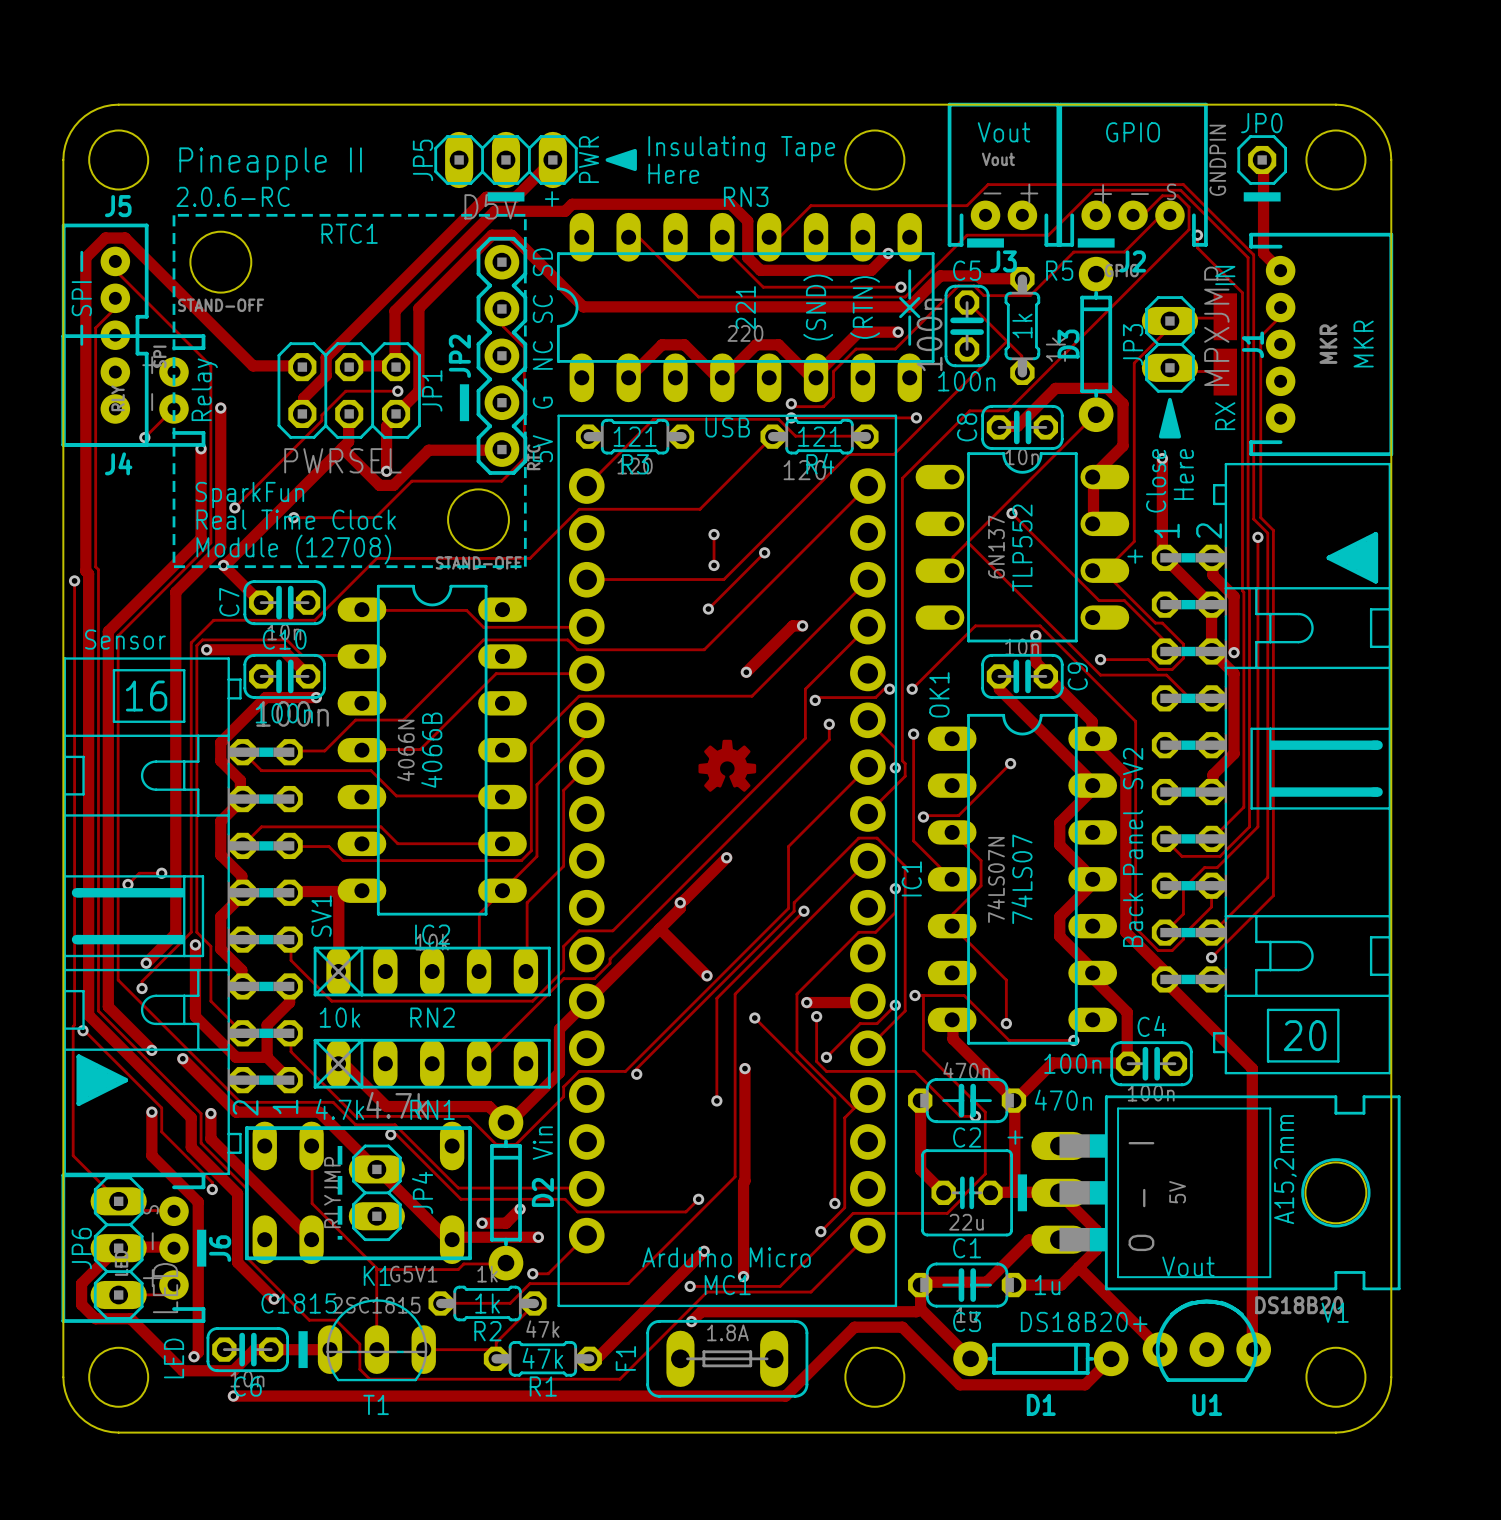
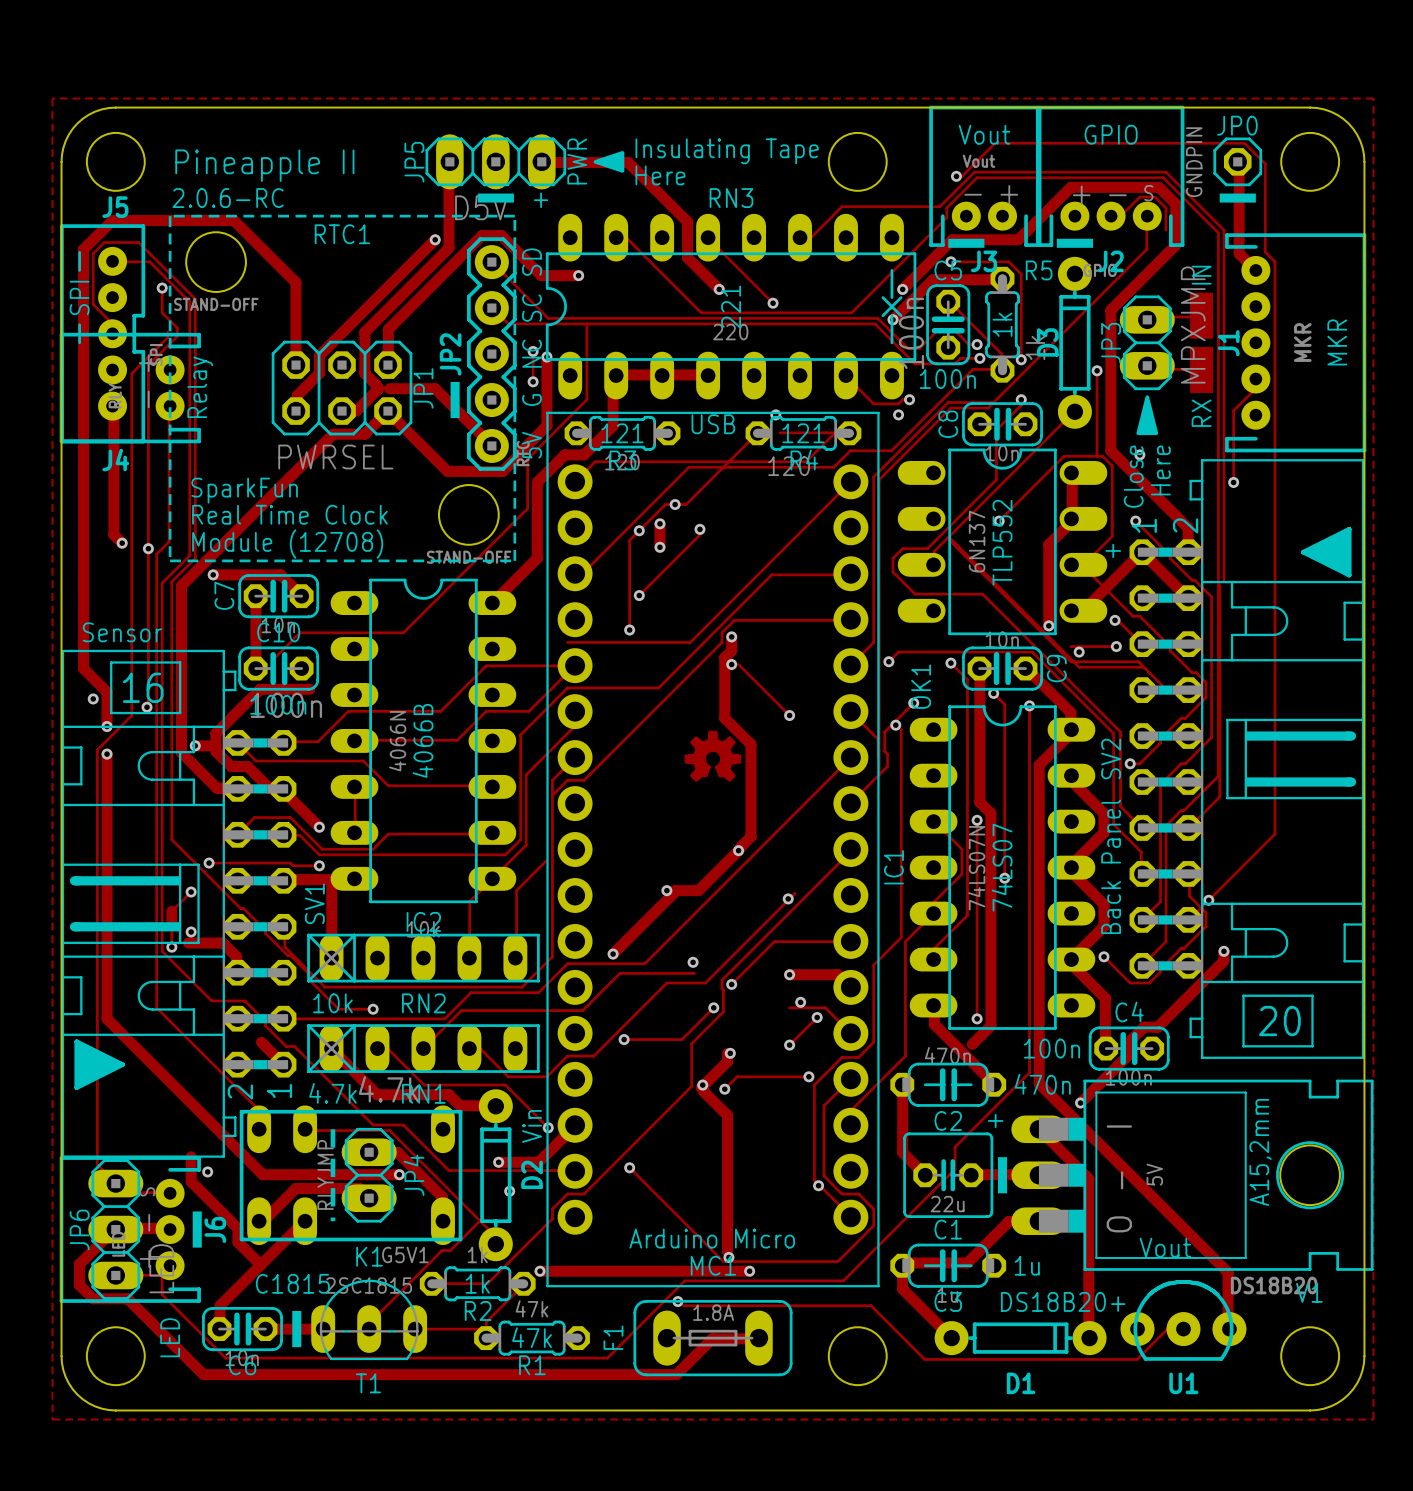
zone outline: none -> (52, 98) (1373, 98) (1373, 1419) (52, 1419) (52, 98)
track: (552, 159) (515, 197) (486, 197) (444, 239) -> (541, 161) (628, 162) (687, 221) (687, 257) (719, 289)
via: none -> (956, 176)
track: (988, 184) (1183, 184) (1253, 254) (1253, 519) (1267, 533) (1267, 877) -> (956, 176) (961, 176) (995, 143) (1244, 143) (1265, 163) (1265, 252) (1274, 261) (1274, 834) (1243, 865)
track: (858, 205) (811, 205) (780, 236) (769, 237) -> (842, 206) (811, 237) (800, 237)
track: (958, 205) (967, 205) -> (684, 296) (701, 312) (851, 312) (946, 217) (948, 206)
track: (1169, 215) (1160, 215) (1124, 252) (1073, 252) (1030, 295) (983, 295) (974, 285) (958, 285) (895, 349) (855, 349) (833, 371) (833, 396) (823, 406) (794, 406) (791, 403) -> none
track: (1189, 229) (1169, 249) -> (1146, 216) (1146, 249)
track: (1197, 235) (1197, 247) (1242, 292) -> (968, 186) (977, 177) (1163, 177) (1218, 232) (1218, 292)
via: (1197, 235) -> none
track: (722, 238) (722, 246) (763, 287) (900, 287) -> (708, 238) (773, 303)
via: none -> (435, 239)
track: (458, 247) (494, 211) (565, 211) (572, 204) (730, 204) (747, 221) (747, 257) (760, 270) (871, 270) (888, 253) -> (449, 248) (449, 161)
via: (888, 253) -> none
track: (85, 257) (105, 238) (125, 238) (253, 365) (302, 365) -> (83, 257) (83, 249) (112, 220) (233, 220) (295, 282) (295, 363)
track: (1248, 257) (1180, 190) (1093, 190) (1048, 235) (967, 235) (905, 297) (698, 297) -> (1223, 257) (1223, 230) (1166, 172) (974, 172) (939, 206)
track: (116, 261) (116, 271) (210, 365) (210, 542) (118, 635) (118, 980) (160, 1022) -> (113, 261) (149, 261) (189, 301) (189, 555) (162, 583) (162, 951) (211, 1000) (244, 1000) (286, 1046) (294, 1046)
track: none -> (950, 261) (1008, 261) (1021, 274) (1021, 359)
via: none -> (950, 261)
track: none -> (491, 262) (548, 318) (877, 318) (908, 348) (919, 348) (937, 330) (955, 330) (968, 344) (977, 344)
track: (552, 275) (583, 306) (909, 306) (940, 275) (1022, 279) -> (893, 319) (933, 279) (1002, 278)
track: none -> (541, 275) (578, 275)
via: none -> (578, 275)
via: (900, 287) -> none
track: none -> (162, 288) (162, 312) (177, 328) (177, 336) (148, 365) (147, 707)
via: none -> (162, 288)
via: none -> (719, 289)
via: none -> (902, 289)
track: (115, 298) (115, 308) (95, 327) (95, 566) (98, 569) (98, 1010) (201, 1113) (201, 1143) (247, 1189) (247, 1258) (309, 1320) (335, 1320) (359, 1344) (359, 1369) (369, 1379) -> (170, 1265) (162, 1275) (162, 1294) (225, 1358) (362, 1358)
via: none -> (773, 303)
text: (SND) (818, 307) -> none
text: (RTN) (865, 307) -> none
track: (1280, 307) (1280, 316) (1260, 336) (1260, 517) (1273, 530) (1273, 895) (1229, 939) -> (1188, 873) (1189, 896) (1206, 912) (1206, 926)
track: (418, 308) (418, 391) (386, 426) (386, 471) -> (410, 307) (388, 329) (387, 365)
track: (503, 309) (503, 326) (524, 347) (524, 458) (501, 481) (411, 481) (375, 517) (293, 517) -> (493, 308) (508, 323) (875, 323) (915, 363) (955, 363) (960, 358) (979, 358)
track: (395, 311) (396, 367) (349, 367) -> (386, 310) (364, 332) (364, 373) (378, 388) (356, 410) (342, 411)
track: (1169, 321) (1169, 327) (1134, 363) (1134, 469) -> (999, 521) (1064, 456) (1102, 456) (1112, 465)
track: none -> (586, 323) (586, 399) (527, 459) (527, 508) (403, 632) (300, 632) (275, 657)
track: (898, 332) (858, 332) (818, 372) (816, 377) (811, 377) (778, 344) (756, 344) (722, 377) -> none
via position: (898, 332) -> (893, 319)
track: (1007, 341) (893, 454) -> (1002, 370) (973, 369) (891, 450) (876, 450)
via: none -> (977, 344)
via: none -> (533, 351)
track: none -> (546, 356) (546, 425) (502, 471) (447, 471) (387, 411) (364, 434) (333, 434) (181, 585) (181, 752) (217, 788) (237, 788)
via: none -> (546, 356)
via: none -> (979, 358)
via: none -> (1021, 359)
track: none -> (1097, 370) (1097, 456)
via: none -> (1097, 370)
track: none -> (616, 375) (613, 380) (613, 425) (584, 454) (564, 454) (537, 482) (537, 558) (492, 603)
track: (629, 377) (662, 344) (684, 344) (716, 377) -> (617, 374) (702, 374)
track: none -> (845, 375) (873, 403) (898, 403) (902, 399) (909, 399)
track: none -> (1255, 379) (1255, 388) (1233, 410) (1233, 482)
via: none -> (533, 381)
track: (386, 391) (345, 391) (321, 415) (321, 420) (234, 507) -> none
via: (397, 391) -> none
via: none -> (909, 399)
via: none -> (1021, 399)
via: (791, 403) -> none
track: none -> (993, 402) (948, 402) (873, 476) (873, 642) (850, 665)
track: none -> (112, 406) (113, 534) (122, 543)
track: (220, 408) (220, 547) (175, 592) -> (112, 333) (112, 323) (93, 304) (93, 253) (104, 242) (138, 242) (195, 299) (195, 558) (171, 581) (171, 585)
via: (220, 408) -> none
track: (172, 409) (144, 437) -> (169, 406) (169, 541) (156, 554) (156, 1007)
track: (349, 413) (348, 441) (223, 565) (261, 602) -> (255, 668) (255, 596)
track: (791, 417) (916, 417) -> none
track: (998, 427) (1017, 426) (1055, 388) (1107, 388) (1123, 403) (1123, 446) (1092, 477) -> none
track: (795, 436) (778, 419) (653, 419) (607, 465) -> (849, 433) (833, 434) (806, 461) (595, 461)
via: (144, 437) -> none
track: (201, 448) (201, 538) (108, 631) (108, 1006) (151, 1050) -> none
via: (201, 448) -> none
track: (342, 448) (379, 485) (393, 485) (428, 450) (501, 449) -> (389, 388) (435, 388) (491, 445)
track: (867, 454) (848, 454) (723, 579) (594, 579) -> (850, 450) (833, 467) (688, 467) (582, 573)
track: (1162, 458) (1162, 552) (1164, 557) -> (1071, 610) (1083, 610) (1142, 552)
via: (386, 471) -> none
track: (902, 478) (902, 741) -> (884, 474) (879, 479) (879, 774)
via: none -> (1233, 482)
via: (234, 507) -> none
track: (678, 509) (579, 509) (529, 558) (376, 558) (314, 620) (213, 620) (191, 642) (191, 932) (142, 981) (142, 988) -> (665, 504) (629, 540) (629, 630)
via: none -> (675, 504)
track: (1011, 513) (1099, 600) (1124, 600) (1163, 639) (1163, 651) -> (1115, 620) (1117, 620) (1141, 643)
via position: (1011, 513) -> (999, 521)
via: (293, 517) -> none
track: none -> (1071, 518) (1069, 523) (1048, 544) (1048, 625)
via: none -> (1135, 521)
track: none -> (659, 523) (659, 547)
via: none -> (659, 523)
track: (714, 534) (714, 565) -> (533, 351) (533, 381)
via: none -> (639, 530)
track: none -> (702, 532) (639, 595)
track: (1257, 537) (1257, 826) (1217, 867) (1204, 867) (1183, 888) -> (1135, 521) (1192, 580) (1195, 580) (1211, 596) (1211, 737) (1185, 763) (1181, 763) (1160, 784) (1160, 876)
via: (1257, 537) -> none
via: none -> (122, 543)
via: none -> (659, 547)
track: (764, 552) (708, 609) -> none
via: (764, 552) -> none
via: none -> (148, 548)
track: (1211, 557) (1212, 575) (1234, 596) (1234, 652) -> (1188, 552) (1188, 527) (1110, 450) (1110, 310) (1175, 245) (1175, 203) (1159, 187) (1070, 187) (1018, 239) (952, 239) (902, 289)
via position: (223, 565) -> (213, 574)
via: (714, 565) -> none
track: (85, 571) (88, 573) (88, 1015) (191, 1117) (191, 1147) (237, 1193) (237, 1262) (274, 1299) -> (83, 565) (83, 668) (107, 692) (107, 726)
track: (74, 580) (73, 1155) (99, 1182) -> (167, 332) (167, 337) (131, 373) (131, 715) (97, 749) (97, 1165)
via: (74, 580) -> none
track: none -> (213, 574) (280, 574) (301, 596)
track: (867, 580) (751, 696) (671, 696) -> (850, 574) (771, 574) (658, 687)
track: (1248, 587) (1249, 826) (1219, 856) (1182, 856) (1164, 838) -> (1021, 399) (1021, 405) (996, 430) (996, 479) (927, 548) (902, 548) (893, 558) (893, 572) (915, 594) (982, 594) (1120, 732) (1120, 806) (1142, 827)
track: none -> (1218, 584) (1218, 776) (1166, 825) (1166, 941) (1142, 965)
track width: thick (175, 592) (175, 850) -> thin (171, 585) (171, 839)
via: none -> (639, 595)
track: (1211, 604) (1211, 651) (1234, 673) (1234, 753) (1212, 774) (1211, 792) -> none
track: (361, 609) (466, 610) (483, 627) (586, 626) -> none
via: (708, 609) -> none
track: (802, 625) (792, 625) (746, 672) -> none
via: (802, 625) -> none
track: (867, 627) (805, 689) (805, 738) (612, 930) (579, 930) (563, 946) -> (850, 620) (734, 620) (722, 632) (722, 642) (584, 780) (567, 780) (552, 795)
via: none -> (1115, 620)
track: (1035, 635) (1035, 662) (1044, 670) (1045, 676) -> none
via position: (1035, 635) -> (1048, 625)
via: none -> (629, 630)
track: none -> (731, 636) (731, 650) (724, 657) (724, 718) (750, 744) (750, 836) (698, 890) (675, 890) (613, 954)
via: none -> (731, 636)
track: (1183, 644) (1183, 658) (1172, 669) (1160, 669) -> (1143, 667) (1138, 661)
track: none -> (1160, 636) (1170, 646) (1170, 650) (1192, 672) (1196, 672) (1206, 682) (1206, 697) (1185, 718) (1181, 718) (1139, 763) (1130, 763)
track: (206, 649) (282, 649) (308, 676) -> none
via: (206, 649) -> none
track: (579, 649) (567, 639) (483, 639) (403, 720) -> none
via: (1234, 652) -> none
track: none -> (1070, 646) (1116, 646)
via: none -> (1116, 646)
track: (361, 656) (302, 655) (286, 639) (202, 639) (196, 645) (196, 932) (210, 946) (210, 1001) (242, 1033) -> none
track: (1100, 659) (1148, 659) (1158, 669) -> (947, 538) (1070, 661) (1135, 661)
via: none -> (888, 661)
track: none -> (950, 663) (967, 679) (967, 915) (934, 948) (933, 959)
via: none -> (950, 663)
track: none -> (738, 664) (789, 715)
track: none -> (574, 665) (528, 711) (486, 711) (457, 740) (411, 740)
track: (889, 689) (884, 689) (875, 697) (818, 697) (815, 700) -> none
via: (889, 689) -> none
track: (912, 689) (975, 625) (1040, 625) (1135, 721) (1135, 742) -> (888, 661) (898, 652) (1032, 652) (1113, 733)
via: (912, 689) -> none
track: (999, 689) (1090, 780) (1092, 790) (1059, 822) -> (1071, 729) (1069, 734) (1039, 765) (1039, 812)
track: none -> (979, 681) (979, 802) (990, 813) (990, 1025) (972, 1044)
via: (316, 697) -> none
via: (815, 700) -> none
track: none -> (993, 693) (1004, 704) (1004, 878)
via: none -> (993, 693)
via: none -> (93, 698)
track: none -> (913, 703) (884, 732)
via: none -> (913, 703)
track: none -> (1029, 705) (1029, 1072) (955, 1147) (955, 1169) (942, 1181)
via: none -> (1029, 705)
via: none -> (147, 707)
track: (449, 720) (420, 749) -> (440, 711) (395, 711)
via: none -> (789, 715)
track: (829, 724) (829, 739) (610, 958) (610, 963) (594, 978) (563, 978) (479, 1063) -> none
via: (829, 724) -> none
track: (913, 734) (913, 840) (952, 879) -> none
via: none -> (107, 726)
track: (1092, 738) (1094, 743) (1125, 774) (1125, 824) -> (1071, 775) (1072, 781) (1103, 813)
track: none -> (195, 745) (210, 745)
via: none -> (195, 745)
track: none -> (107, 754) (107, 1018) (262, 1174) (399, 1174)
via: none -> (107, 754)
track: (1010, 763) (958, 815) (923, 817) -> none
via: (1010, 763) -> none
via: (895, 767) -> none
via: none -> (1130, 763)
track: (236, 776) (240, 780) (240, 794) (242, 799) (220, 821) (220, 854) (241, 876) (242, 892) (220, 916) (220, 949) (227, 956) -> (231, 766) (247, 766) (269, 788) (283, 788)
track: none -> (354, 786) (354, 832)
track: none -> (283, 788) (286, 794) (319, 827)
via: (923, 817) -> none
track: (260, 828) (380, 826) (397, 843) (502, 843) -> none
track: none -> (977, 820) (977, 1018)
via: none -> (977, 820)
track: (1135, 835) (1135, 928) (1158, 950) (1172, 950) (1183, 939) (1183, 935) (1211, 906) (1211, 885) -> (1113, 824) (1141, 852) (1142, 873)
via: none -> (319, 827)
track: (1125, 843) (1125, 916) -> (1103, 832) (1073, 863) (1071, 867) (1072, 872) (1103, 904)
track: (1059, 845) (1092, 879) (1092, 884) (1059, 916) -> (1039, 834) (1039, 904)
track: (306, 846) (328, 846) (343, 860) -> (254, 817) (290, 817) (322, 849) (335, 849)
track: none -> (300, 835) (319, 854) (505, 854) (511, 849)
track: (788, 846) (788, 908) (625, 1071) (605, 1071) -> (795, 893) (705, 983) (666, 983) (593, 1056)
track: (175, 850) (175, 923) -> (191, 892) (171, 911)
track: none -> (171, 839) (265, 930) (265, 933) (287, 955) (290, 955) (309, 974) (309, 980) (338, 1009) (373, 1009)
track: (726, 857) (680, 902) (680, 908) (559, 1029) (559, 1072) (513, 1119) (505, 1122) -> none
via position: (726, 857) -> (738, 850)
track: (380, 860) (521, 860) -> (373, 849) (388, 834) (492, 832)
track: (867, 860) (735, 994) (735, 1176) (628, 1283) (529, 1283) (510, 1303) (497, 1303) -> (850, 849) (722, 980) (723, 1011) (691, 1043) (691, 1086) (584, 1194)
track: (563, 866) (558, 871) -> (552, 854) (552, 933)
track: (161, 873) (139, 873) (127, 884) -> none
via: (161, 873) -> none
track: none -> (209, 863) (290, 863) (293, 865) (319, 865)
via: none -> (209, 863)
via: none -> (319, 865)
via: (127, 884) -> none
track: (895, 888) (895, 912) (875, 932) (858, 932) (796, 994) (796, 1051) (853, 1108) -> none
via: (895, 888) -> none
via: none -> (1004, 878)
via: none -> (191, 892)
track: (803, 911) (716, 998) (716, 1100) -> none
via: none -> (1208, 900)
track: (952, 926) (1006, 980) (1006, 1023) -> (933, 913) (905, 941) (905, 981)
track: (659, 928) (707, 975) -> none
track: (1125, 932) (1163, 970) (1163, 978) (1167, 984) (1252, 1068) (1252, 1292) -> (1039, 923) (1039, 1083) (1228, 1272)
track: (175, 933) (146, 963) -> (171, 920) (171, 947)
track: (1059, 936) (1090, 967) (1092, 972) -> (1103, 919) (1103, 926) (1071, 959)
track: (195, 944) (195, 1016) (236, 1057) (267, 1057) (267, 1025) (289, 1002) (289, 986) -> none
track: none -> (850, 941) (774, 941) (731, 984)
track: none -> (188, 943) (222, 943)
track: none -> (1188, 944) (1181, 948) (1149, 983) (1130, 983) (1103, 956)
via: (1211, 957) -> none
via: none -> (171, 947)
via: (146, 963) -> none
track: none -> (1223, 951) (1223, 960) (1157, 1027) (1143, 1027) (1127, 1043) (1127, 1056) (1080, 1102)
via: none -> (1223, 951)
via: none -> (613, 954)
via: none -> (1103, 956)
track: none -> (694, 973) (619, 973) (582, 1010) (461, 1010) (423, 1048)
via: (142, 988) -> none
track: (915, 995) (964, 995) (1009, 1040) (1073, 1040) -> none
via: (915, 995) -> none
via: none -> (731, 984)
track: (867, 1001) (806, 1002) -> (850, 987) (837, 974) (789, 974)
via position: (806, 1002) -> (789, 974)
track: (895, 1005) (877, 1023) (860, 1023) (826, 1057) -> none
via: (895, 1005) -> none
track: (816, 1016) (816, 1061) (826, 1071) (915, 1071) (959, 1116) (975, 1116) -> none
track: (754, 1018) (834, 1098) (834, 1203) -> none
via: (754, 1018) -> none
track: none -> (713, 1007) (682, 1039) (624, 1039)
via: none -> (713, 1007)
via: none -> (373, 1009)
via position: (1006, 1023) -> (977, 1018)
track: (83, 1030) (161, 1107) (161, 1131) (212, 1182) (212, 1189) -> none
via: (83, 1030) -> none
track: none -> (817, 1017) (789, 1045)
via: none -> (817, 1017)
track: (291, 1033) (291, 1051) (300, 1061) -> (284, 1018) (444, 1018) (471, 992) (538, 992) (567, 963) (644, 963) (773, 835)
via: (1073, 1040) -> none
track: (867, 1048) (905, 1010) (905, 866) (877, 838) (858, 838) (794, 902) (794, 911) (636, 1068) (636, 1074) -> (850, 1033) (825, 1007) (789, 1007)
via: (151, 1050) -> none
track: (923, 1050) (985, 1112) (985, 1174) (961, 1199) -> (905, 1035) (905, 1056) (851, 1109) (850, 1125)
via: (826, 1057) -> none
track: (182, 1058) (236, 1112) (319, 1112) (376, 1169) -> none
via: (182, 1058) -> none
via: none -> (789, 1045)
track: none -> (377, 1048) (388, 1049) (424, 1085) (505, 1085) (548, 1127)
track: (1128, 1063) (1052, 1062) (1013, 1100) (1014, 1192) -> none
track: (338, 1064) (344, 1064) (386, 1106) (489, 1106) (504, 1122) -> (331, 1049) (377, 1094) (449, 1094) (460, 1105) (494, 1105)
track: none -> (727, 1053) (727, 1061) (701, 1087) (727, 1115) (727, 1251)
track: (744, 1068) (743, 1276) -> none
via position: (636, 1074) -> (624, 1039)
track: (563, 1086) (563, 1096) (515, 1144) (496, 1144) (468, 1116) (355, 1116) -> (552, 1071) (546, 1076) (508, 1076) (480, 1049) (469, 1048)
track: none -> (808, 1076) (737, 1076) (724, 1089)
via: none -> (808, 1076)
track: (240, 1102) (333, 1102) (355, 1124) (395, 1124) (411, 1141) -> (348, 1100) (373, 1125) (403, 1125)
track: none -> (235, 1086) (258, 1109) (259, 1129)
via: none -> (724, 1089)
track: (151, 1112) (151, 1155) (195, 1199) -> (191, 1156) (191, 1181)
via: (151, 1112) -> none
track: (210, 1113) (210, 1138) (311, 1239) -> (219, 1329) (220, 1305) (305, 1221)
via: (210, 1113) -> none
via: (975, 1116) -> none
track: (844, 1117) (844, 1207) (820, 1231) -> (828, 1101) (824, 1105) (824, 1176) (842, 1194) (858, 1194) (873, 1209) (873, 1225) (837, 1261) (723, 1261) (629, 1167)
via: none -> (1080, 1102)
track: (390, 1134) (396, 1134) (461, 1199) (565, 1199) (579, 1211) -> (487, 1283) (552, 1218) (552, 1209) (567, 1194)
via: (390, 1134) -> none
track: none -> (575, 1125) (538, 1162) (498, 1162)
via: none -> (548, 1127)
track: none -> (1039, 1129) (1088, 1178) (1089, 1338)
track: (312, 1147) (312, 1203) (376, 1268) (376, 1349) -> (305, 1130) (389, 1130) (494, 1235) (495, 1244)
track: (378, 1169) (447, 1238) (451, 1238) -> (370, 1152) (397, 1152) (442, 1196) (442, 1220)
via: none -> (498, 1162)
via: none -> (629, 1167)
via: none -> (399, 1174)
track: (1059, 1192) (1096, 1230) (1096, 1249) (1061, 1285) (1013, 1285) -> none
track: (698, 1199) (685, 1211) (595, 1211) -> none
via: (698, 1199) -> none
track: (198, 1202) (198, 1352) (194, 1356) -> (193, 1184) (238, 1228) (238, 1242) (260, 1265)
track: (520, 1209) (506, 1223) (482, 1223) -> none
track: (947, 1213) (853, 1213) (780, 1286) (690, 1286) -> (928, 1195) (843, 1280) (684, 1280)
track: none -> (369, 1198) (359, 1188) (295, 1188) (264, 1220) (259, 1221)
via: (482, 1223) -> none
via: (820, 1231) -> none
track: (586, 1235) (548, 1273) (532, 1273) -> none
track: (867, 1235) (811, 1292) (707, 1292) (698, 1300) -> (850, 1217) (814, 1180) (814, 1085) (842, 1057) (858, 1057) (873, 1042) (873, 965) (901, 937) (901, 729)
track: (538, 1237) (456, 1237) (452, 1239) -> none
via: (538, 1237) -> none
track: (704, 1251) (597, 1358) (589, 1358) -> none
via: (704, 1251) -> none
track: (505, 1263) (463, 1263) (458, 1269) -> (480, 1220) (449, 1250)
track: (1078, 1267) (1160, 1349) -> none
track: (376, 1269) (451, 1269) -> (369, 1329) (370, 1322) (442, 1250)
via position: (532, 1273) -> (540, 1271)
via: (690, 1286) -> none
track: none -> (540, 1271) (749, 1271)
via: none -> (749, 1271)
via: (274, 1299) -> none
track: (920, 1308) (916, 1311) (701, 1311) (691, 1321) -> none
track: none -> (683, 1305) (870, 1305) (924, 1359) (1137, 1359) (1167, 1329) (1183, 1329)
track: (271, 1349) (254, 1349) (233, 1370) (182, 1370) -> (228, 1374) (203, 1374) (178, 1349)
via: (194, 1356) -> none
track: (1111, 1358) (1085, 1384) (959, 1384) (902, 1327) (854, 1327) (785, 1396) (690, 1396) -> (758, 1338) (712, 1338) (676, 1374)
via: (233, 1396) -> none

